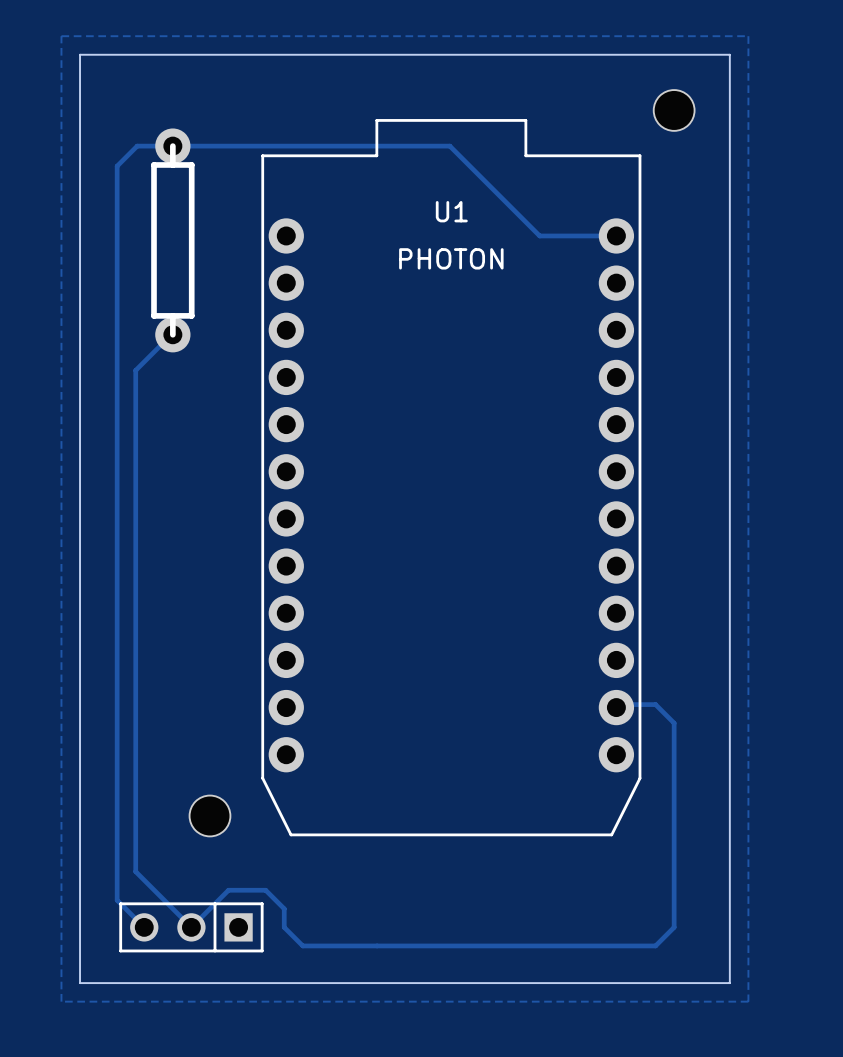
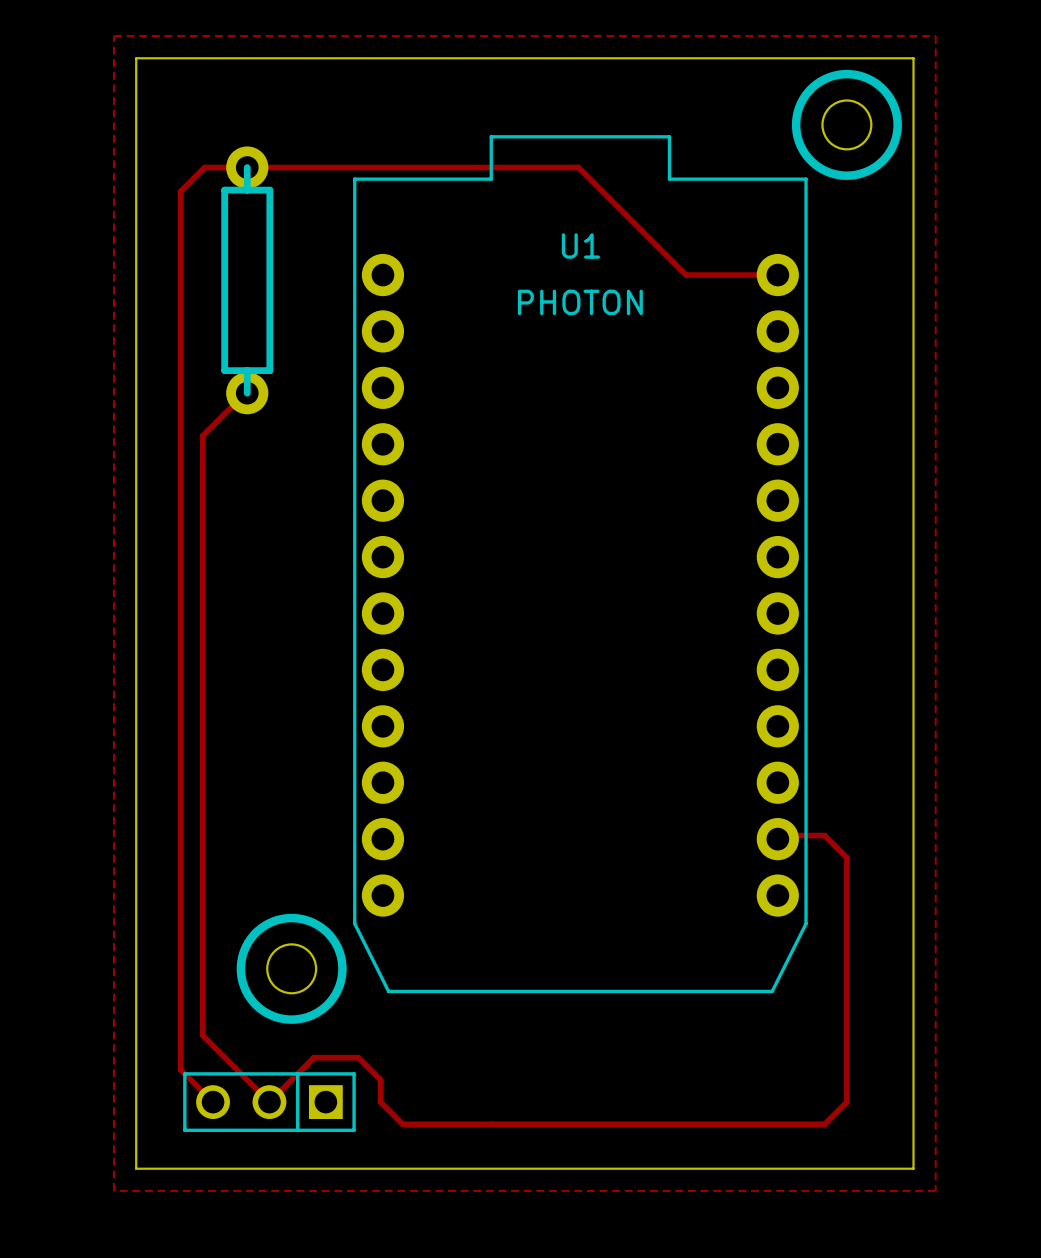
part footprint: [652, 89, 696, 132] -> [791, 69, 902, 180]
part footprint: [188, 794, 232, 838] -> [236, 913, 347, 1024]

